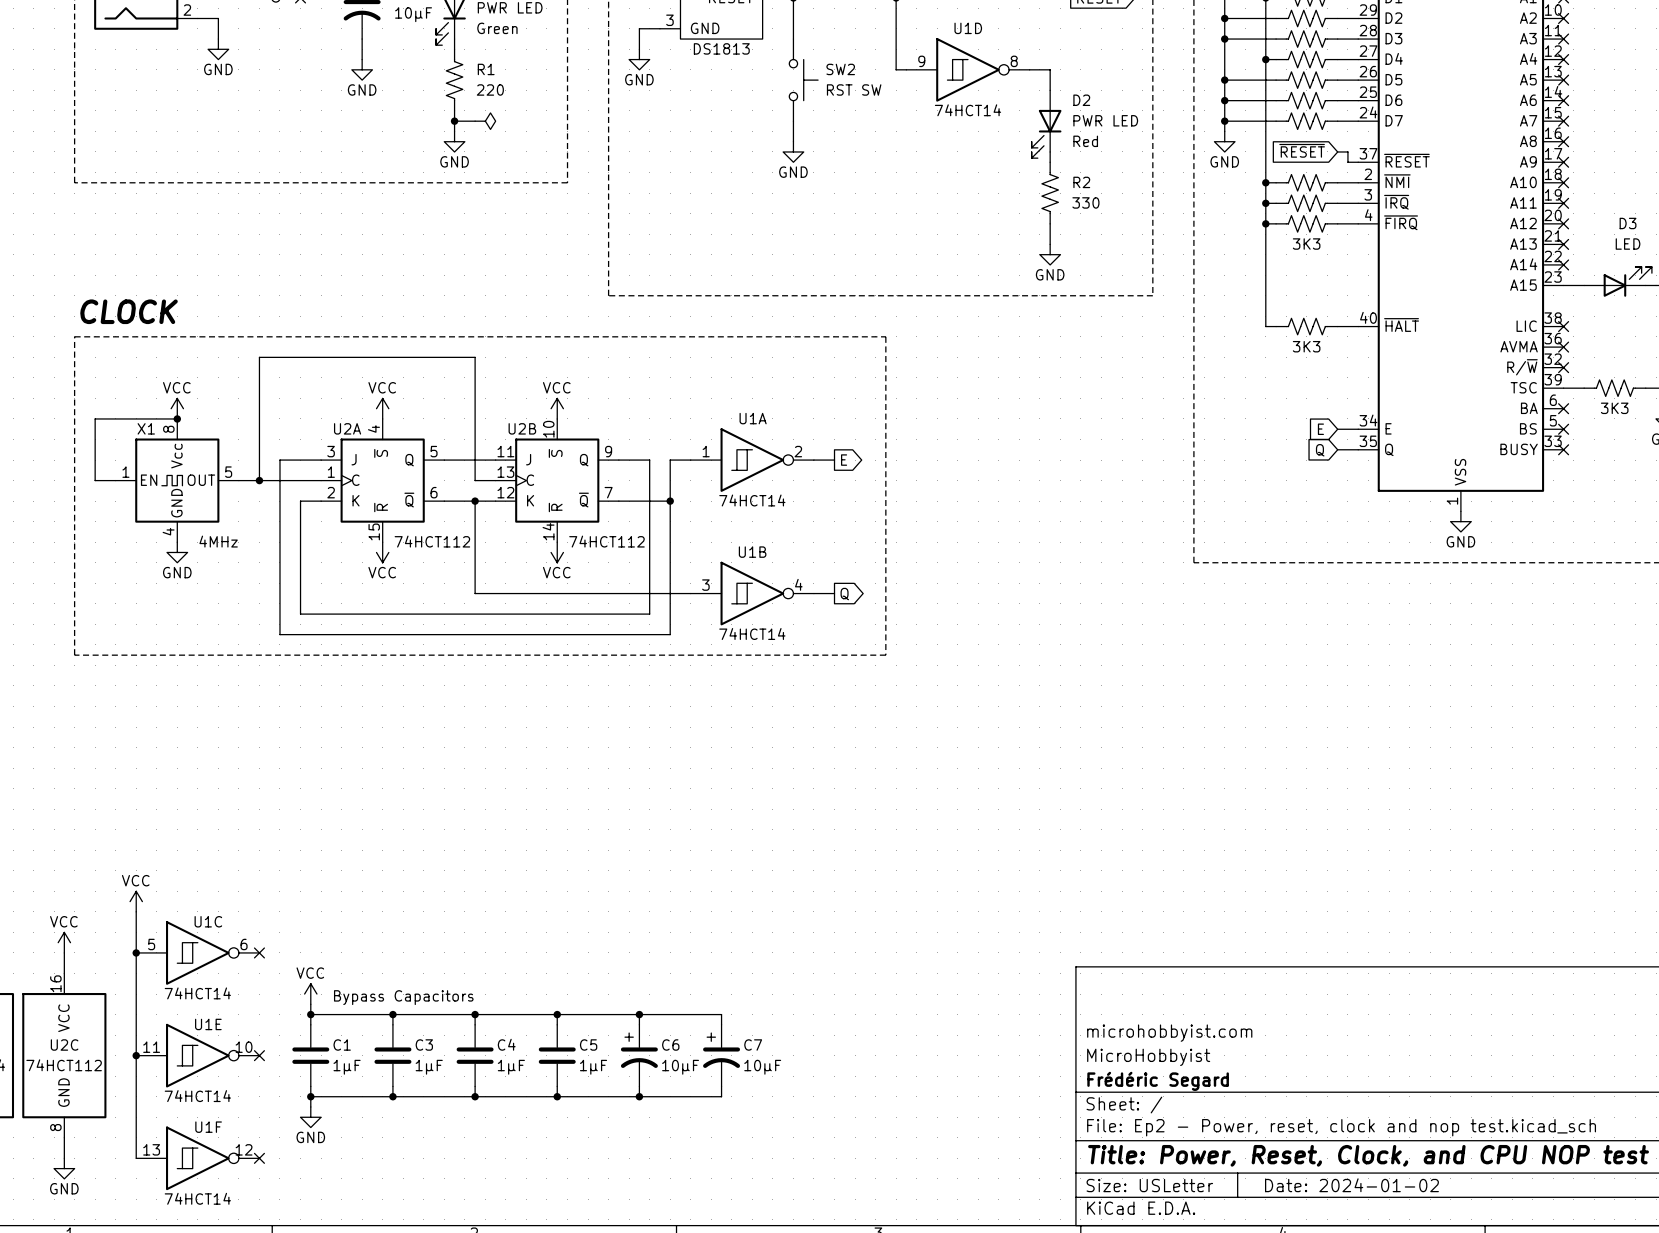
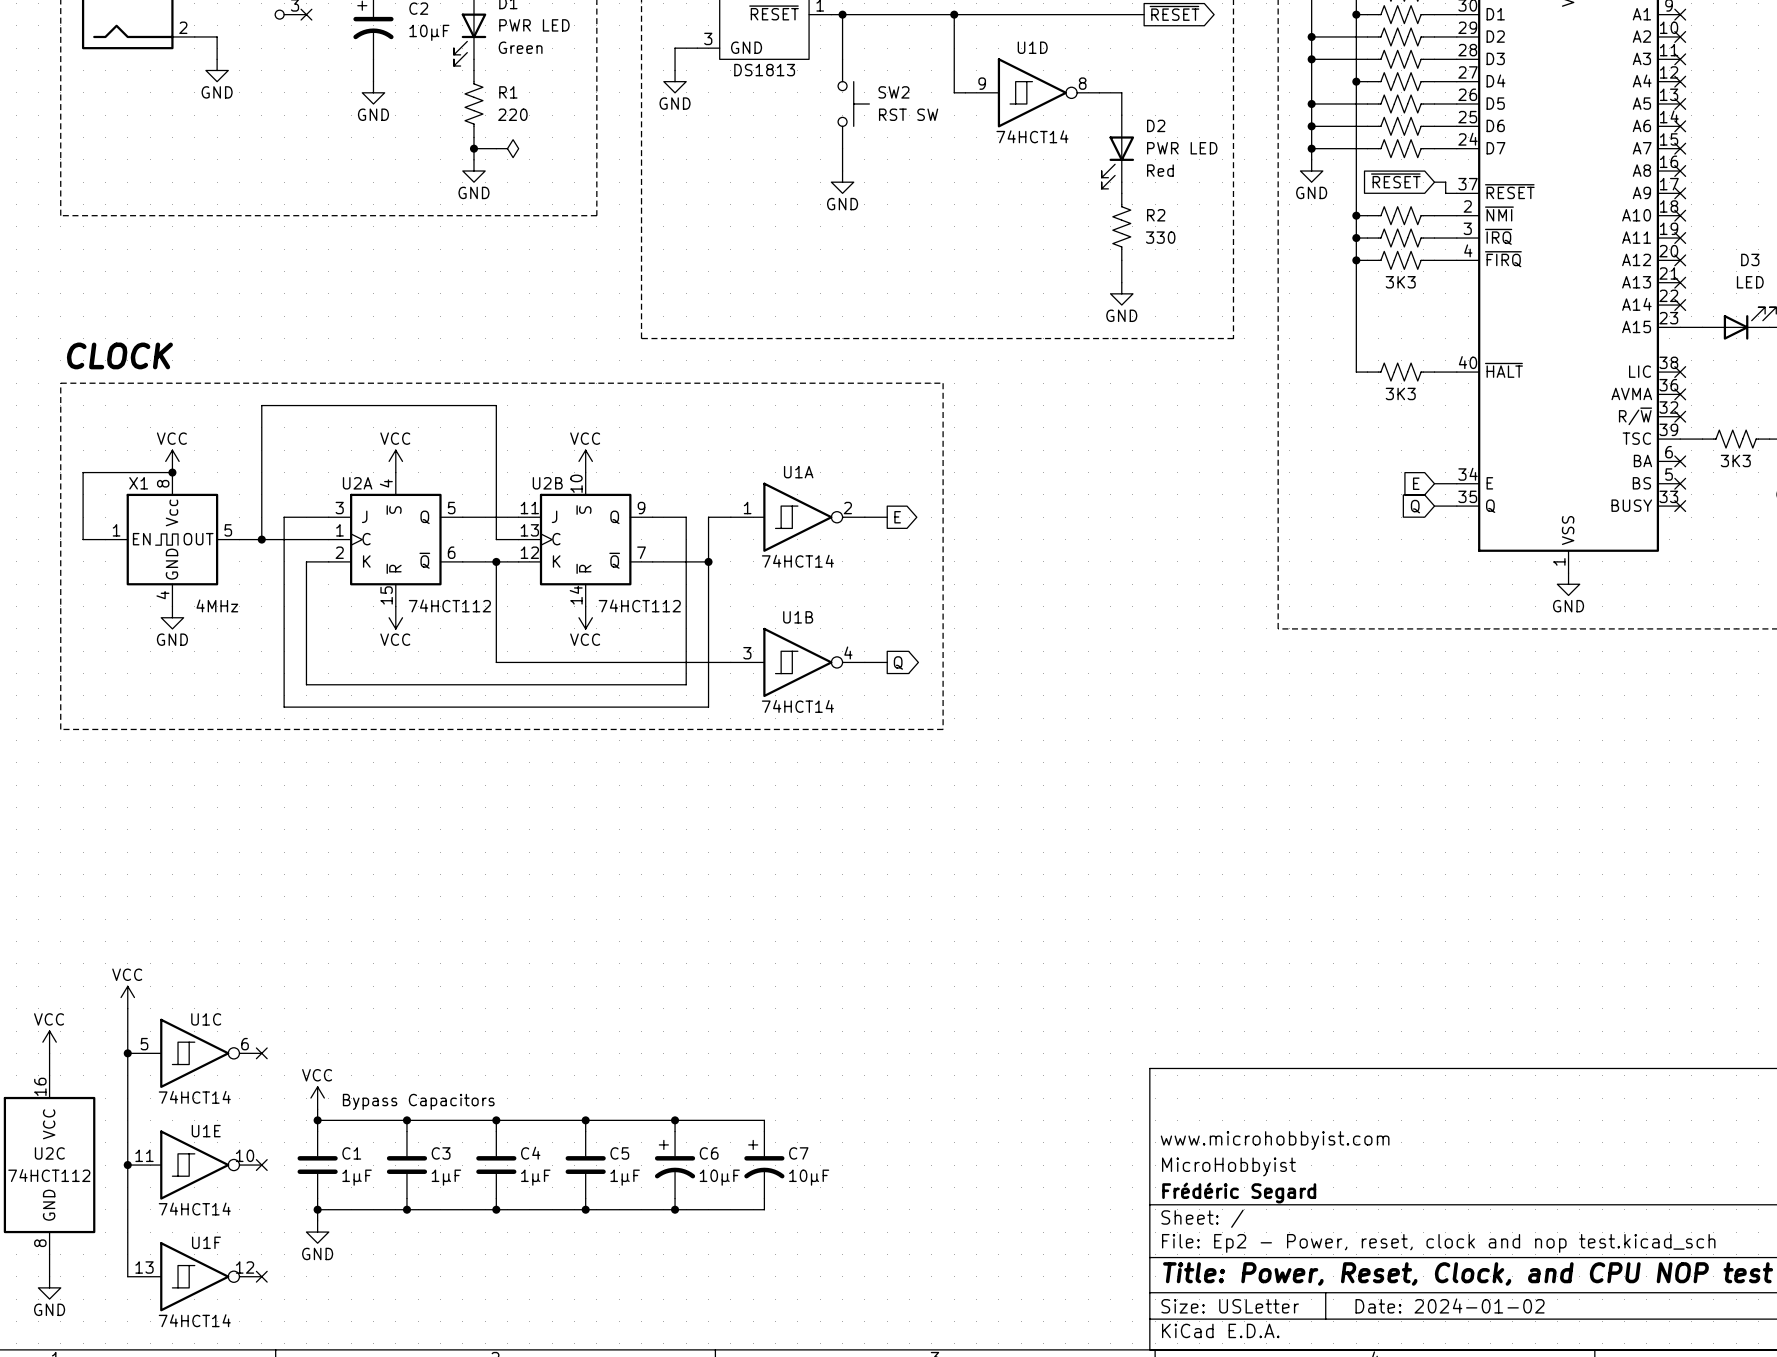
title block: microhobbyist.com (1169, 1033) -> www.microhobbyist.com (1275, 1140)

